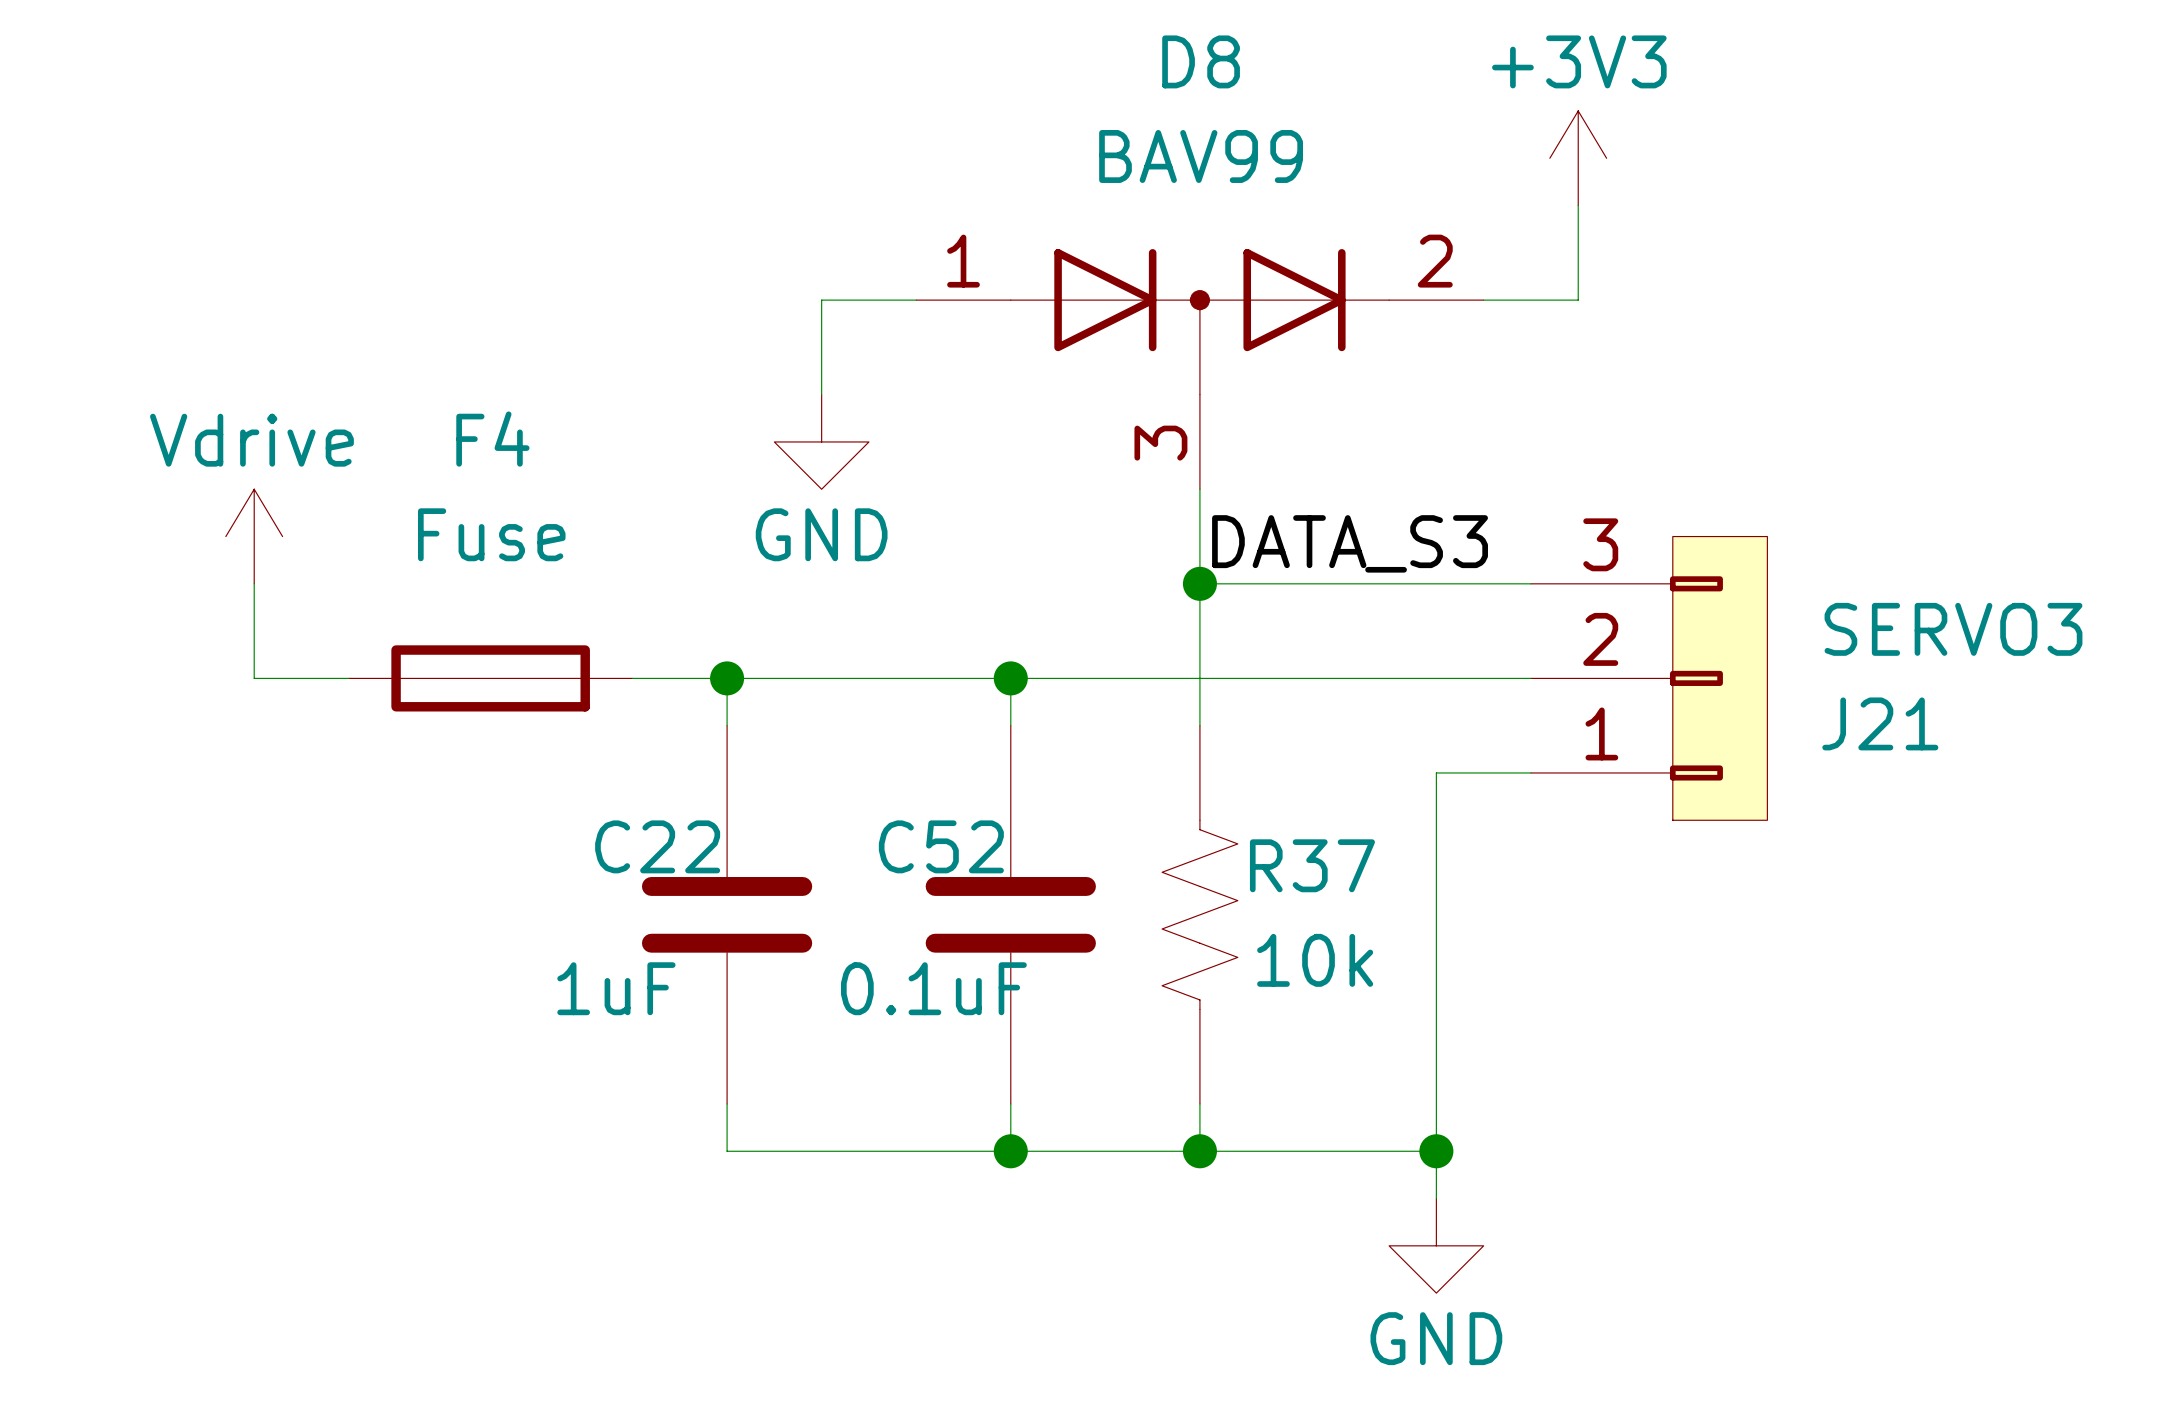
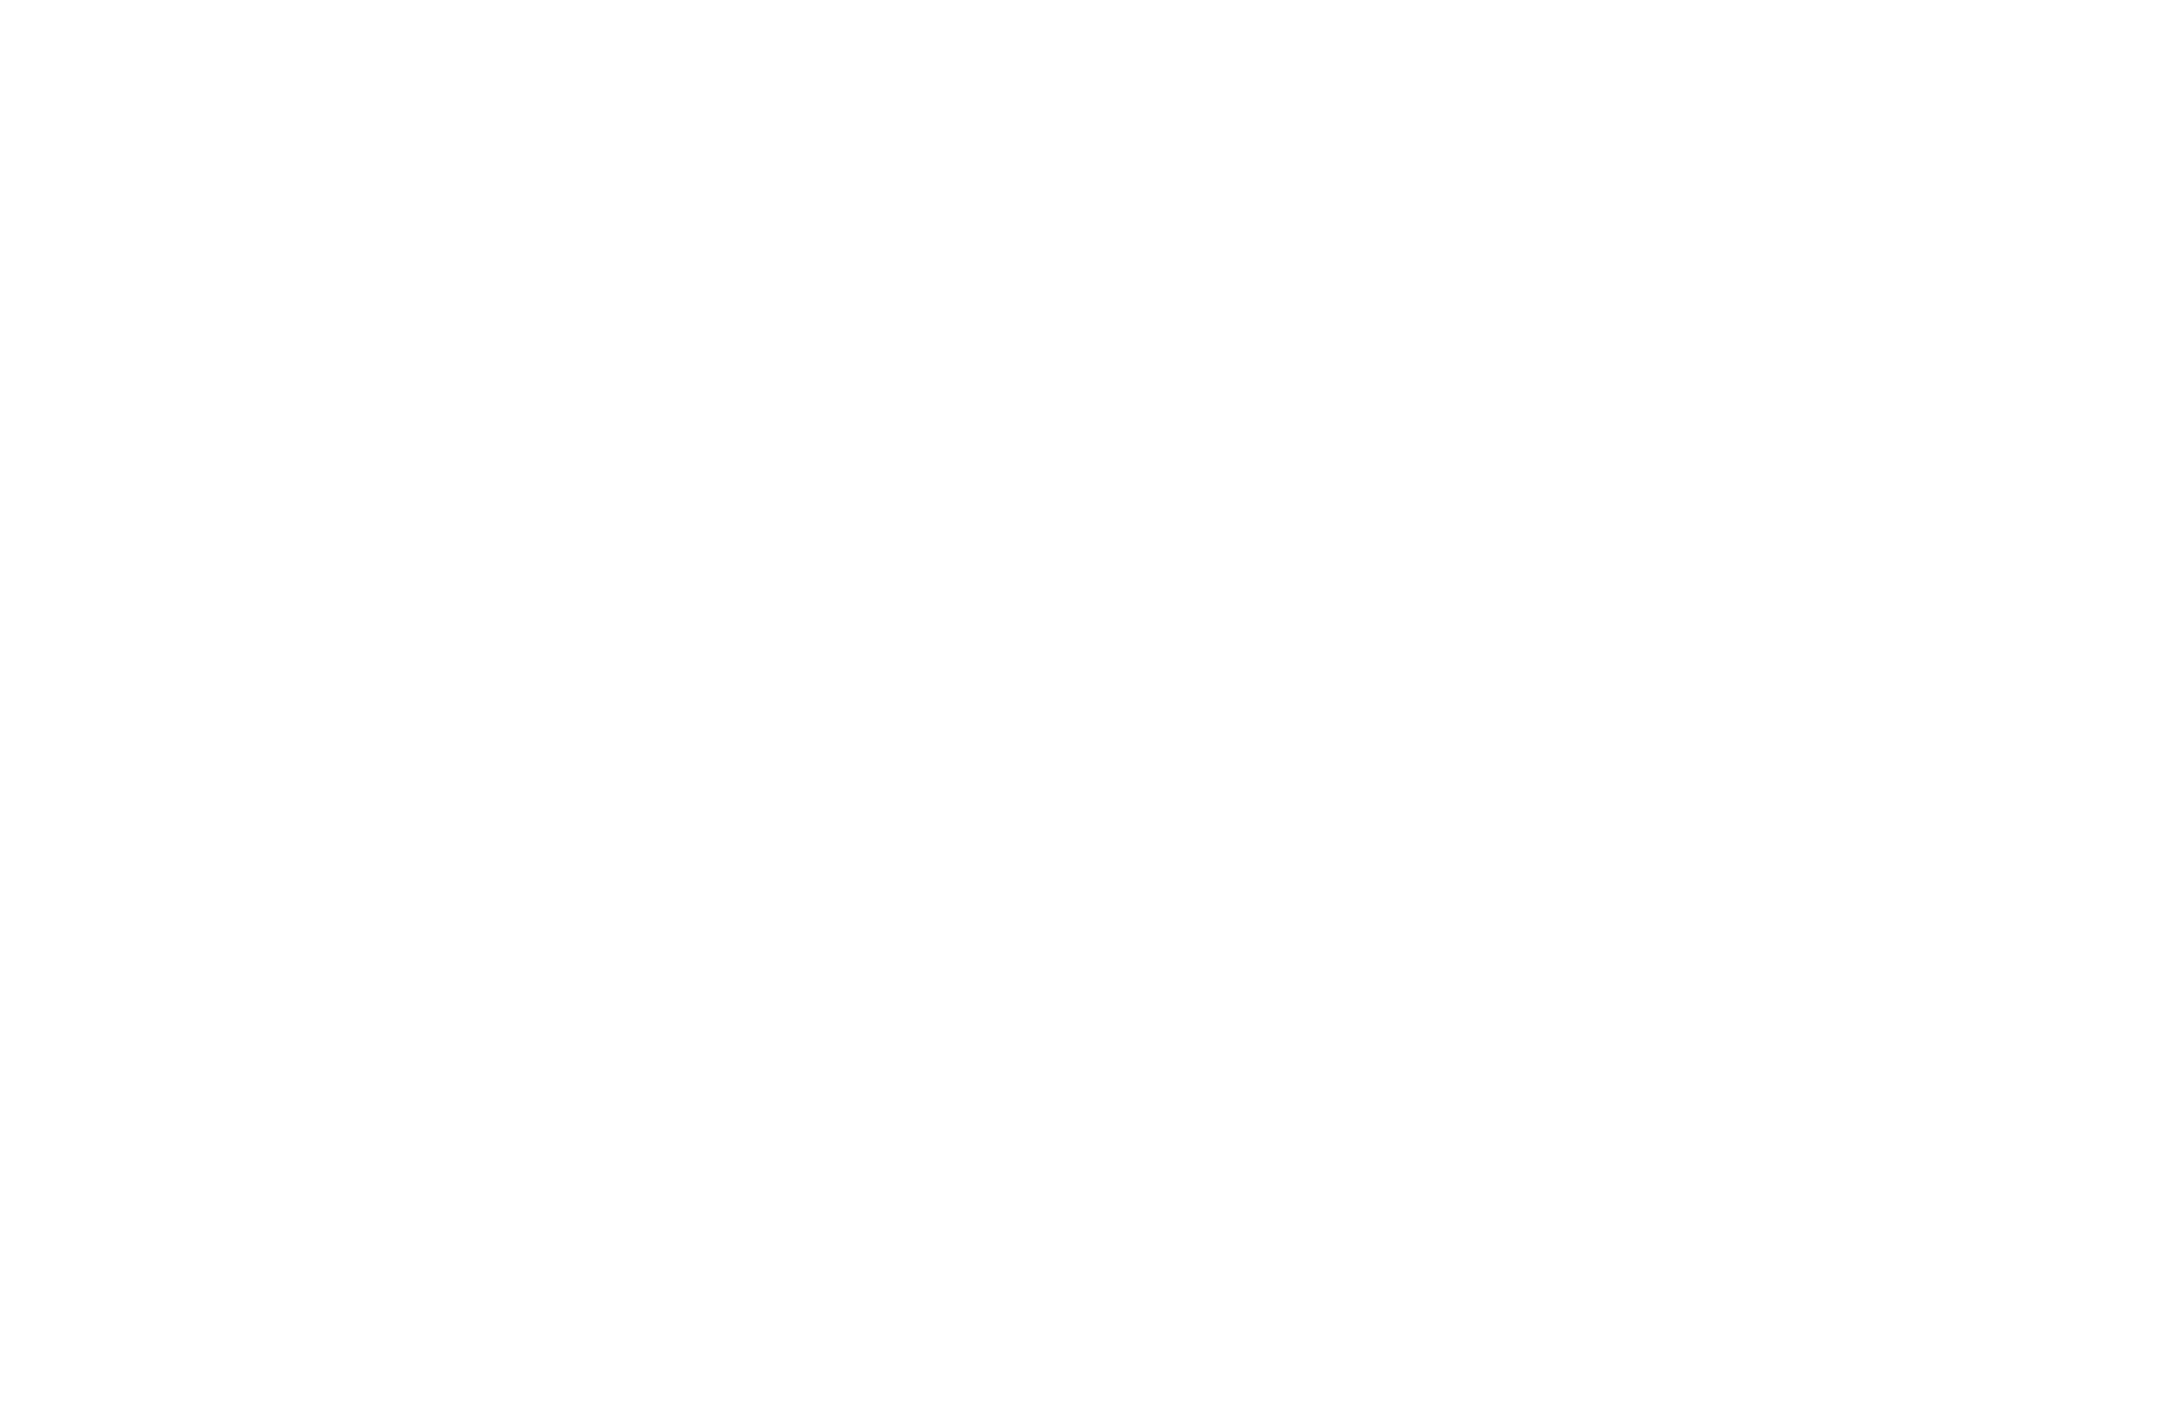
power symbol: +3V3 (1578, 158) -> none
wire: (1578, 205) (1578, 300) (1483, 300) -> none
wire: (916, 300) (821, 300) (821, 394) -> none
D8: BAV99 (1199, 369) -> none
power symbol: GND (821, 441) -> none
wire: (1199, 489) (1199, 725) -> none
power symbol: Vdrive (254, 536) -> none
label: DATA_S3 (1350, 543) -> none
wire: (254, 583) (254, 678) (348, 678) -> none
wire: (1199, 583) (1530, 583) -> none
junction: (1199, 583) -> none
F4: Fuse (490, 678) -> none
wire: (632, 678) (1530, 678) -> none
wire: (727, 678) (727, 725) -> none
junction: (727, 678) -> none
wire: (1010, 678) (1010, 725) -> none
junction: (1010, 678) -> none
J21: SERVO3 (1649, 678) -> none
wire: (1530, 772) (1436, 772) (1436, 1198) -> none
C22: (727, 914) -> none
C52: (1010, 914) -> none
R37: 10k (1199, 914) -> none
wire: (727, 1103) (727, 1151) (1436, 1151) -> none
wire: (1010, 1103) (1010, 1151) -> none
wire: (1199, 1103) (1199, 1151) -> none
junction: (1010, 1151) -> none
junction: (1199, 1151) -> none
junction: (1436, 1151) -> none
power symbol: GND (1436, 1245) -> none

